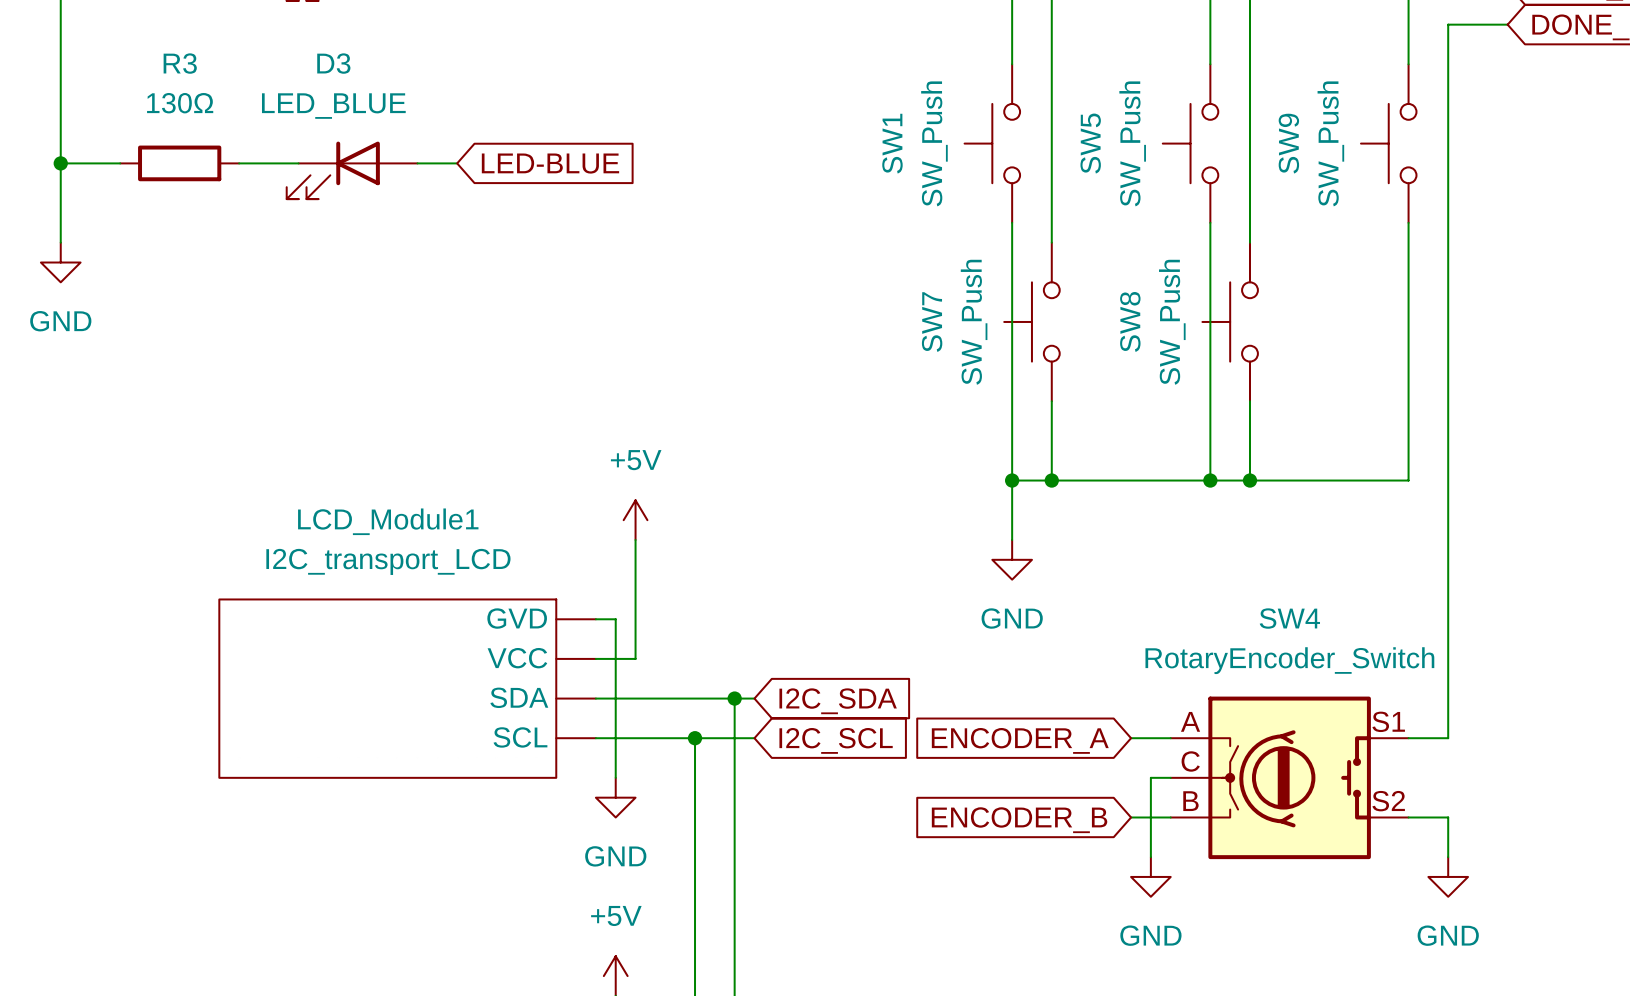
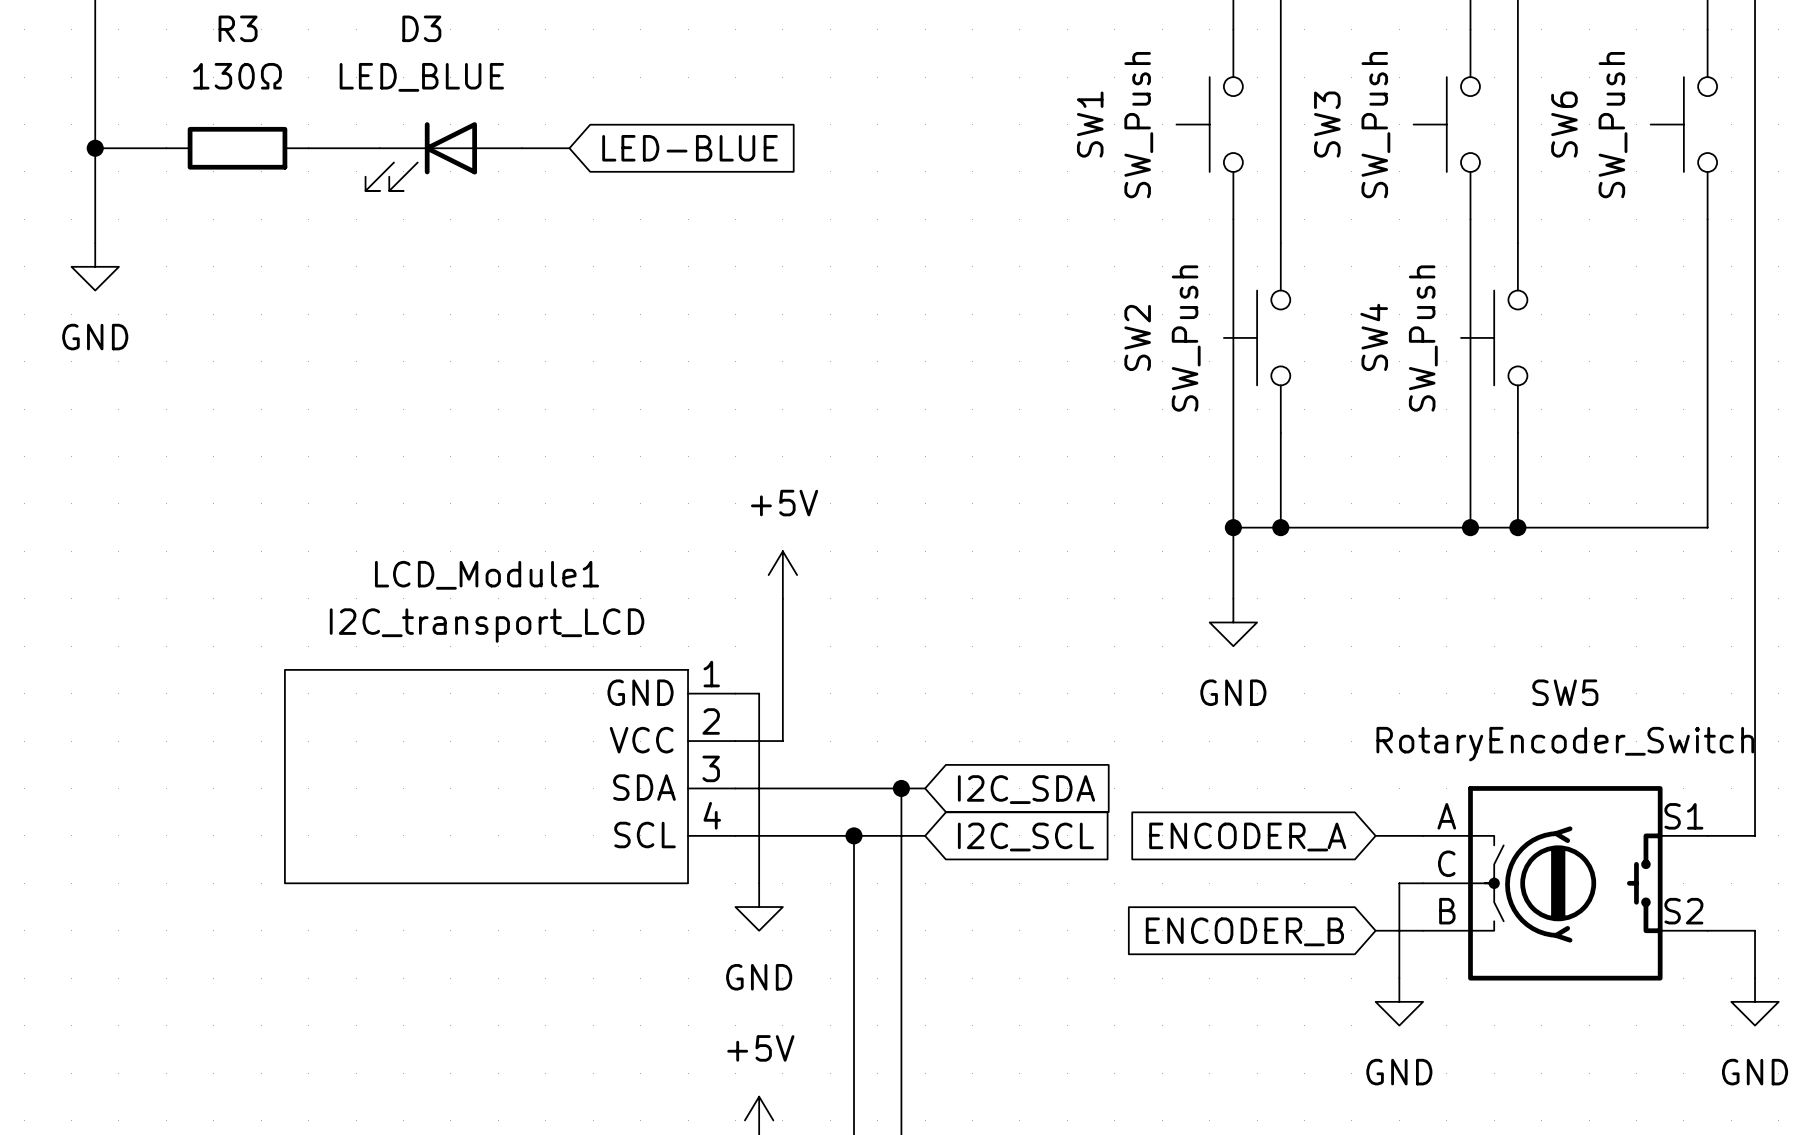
SW5 name: SW5 (1090, 143) -> SW3 (1327, 124)
SW9 name: SW9 (1288, 143) -> SW6 (1564, 124)
SW8 name: SW8 (1130, 321) -> SW4 (1374, 337)
SW7 name: SW7 (932, 322) -> SW2 (1137, 337)
LCD_Module1 pin number: none -> 1 (711, 674)
LCD_Module1 pin name: GVD (517, 618) -> GND (640, 692)
SW4 name: SW4 (1289, 618) -> SW5 (1565, 692)
LCD_Module1 pin number: none -> 2 (711, 721)
LCD_Module1 pin number: none -> 3 (711, 768)
LCD_Module1 pin number: none -> 4 (712, 815)

